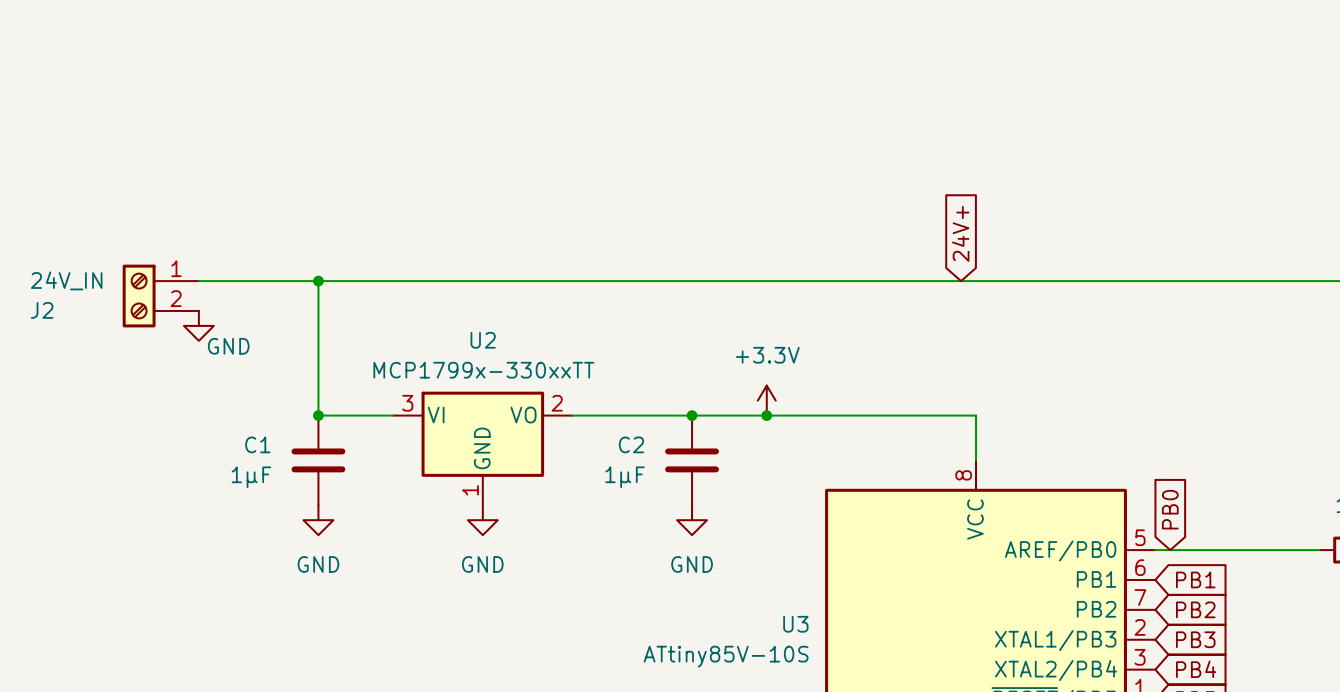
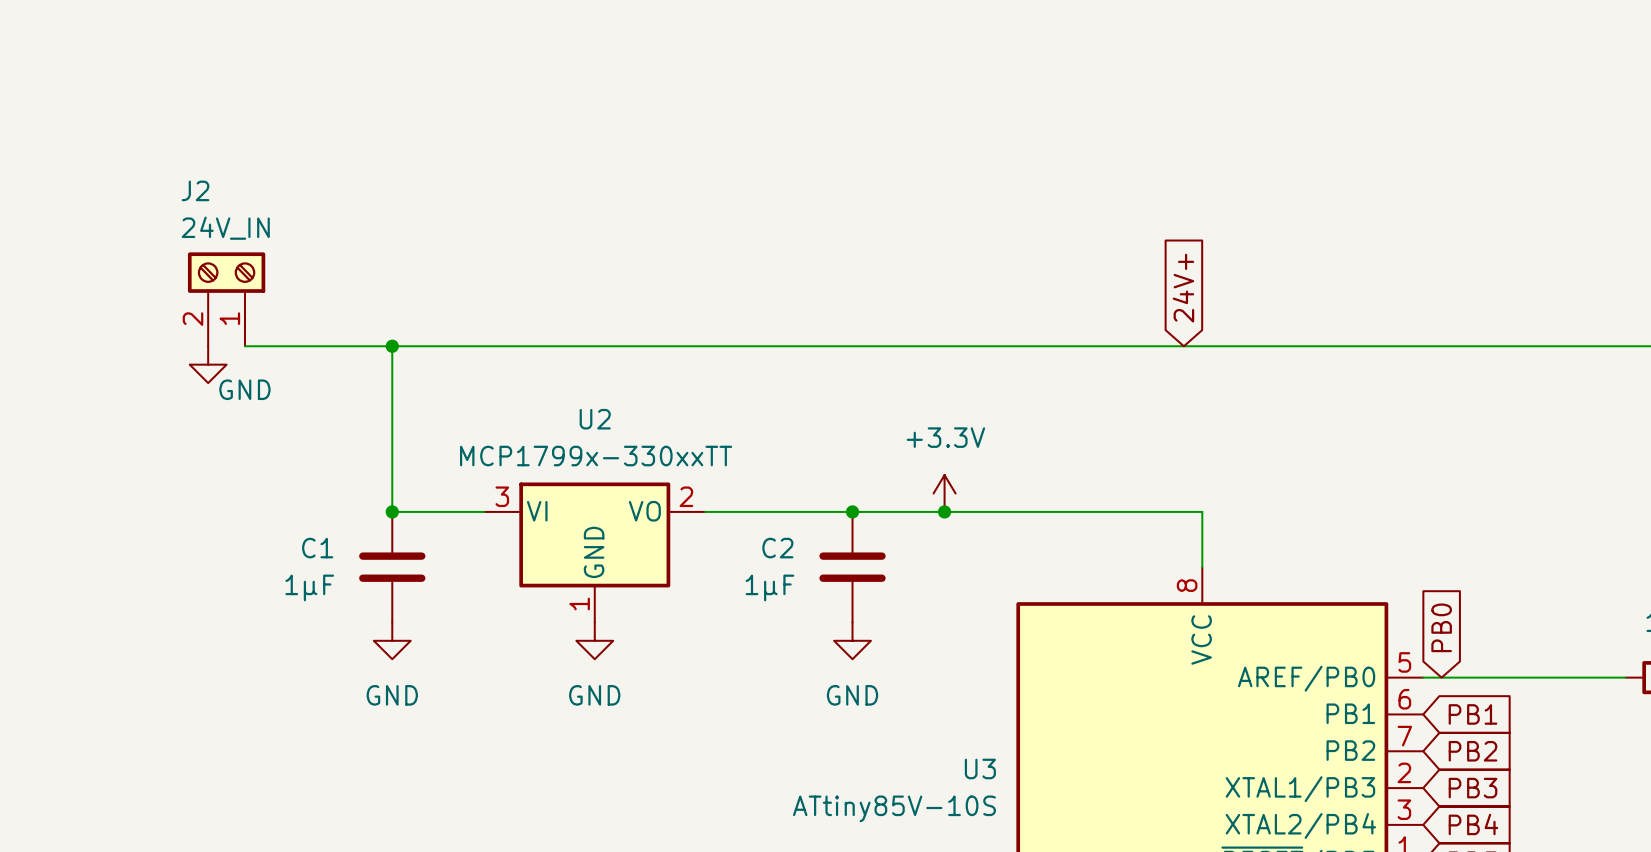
J2 value position: 24V_IN (66, 280) -> 24V_IN (225, 228)
J2 rotation: 0° (139, 296) -> 90° clockwise (226, 272)
J2 position: (160, 296) -> (226, 299)
J2 name position: J2 (42, 310) -> J2 (195, 190)
power symbol position: GND (198, 325) -> GND (208, 364)

